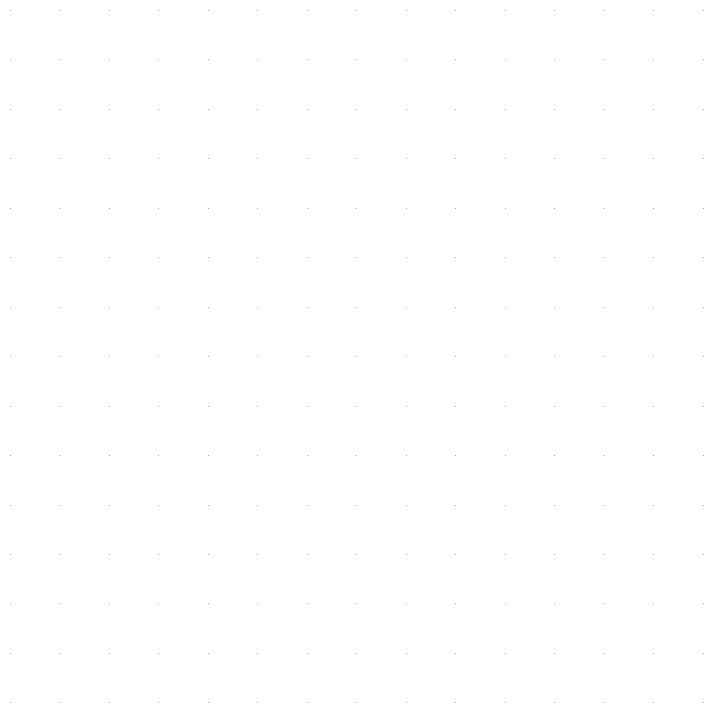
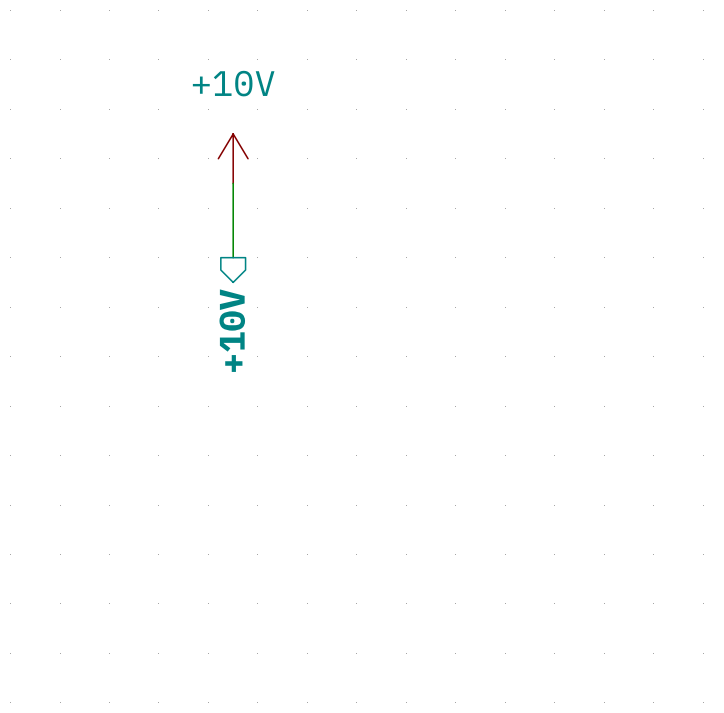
power symbol: none -> +10V (233, 158)
wire: none -> (233, 183) (233, 257)
sheet pin: none -> +10V (232, 330)

